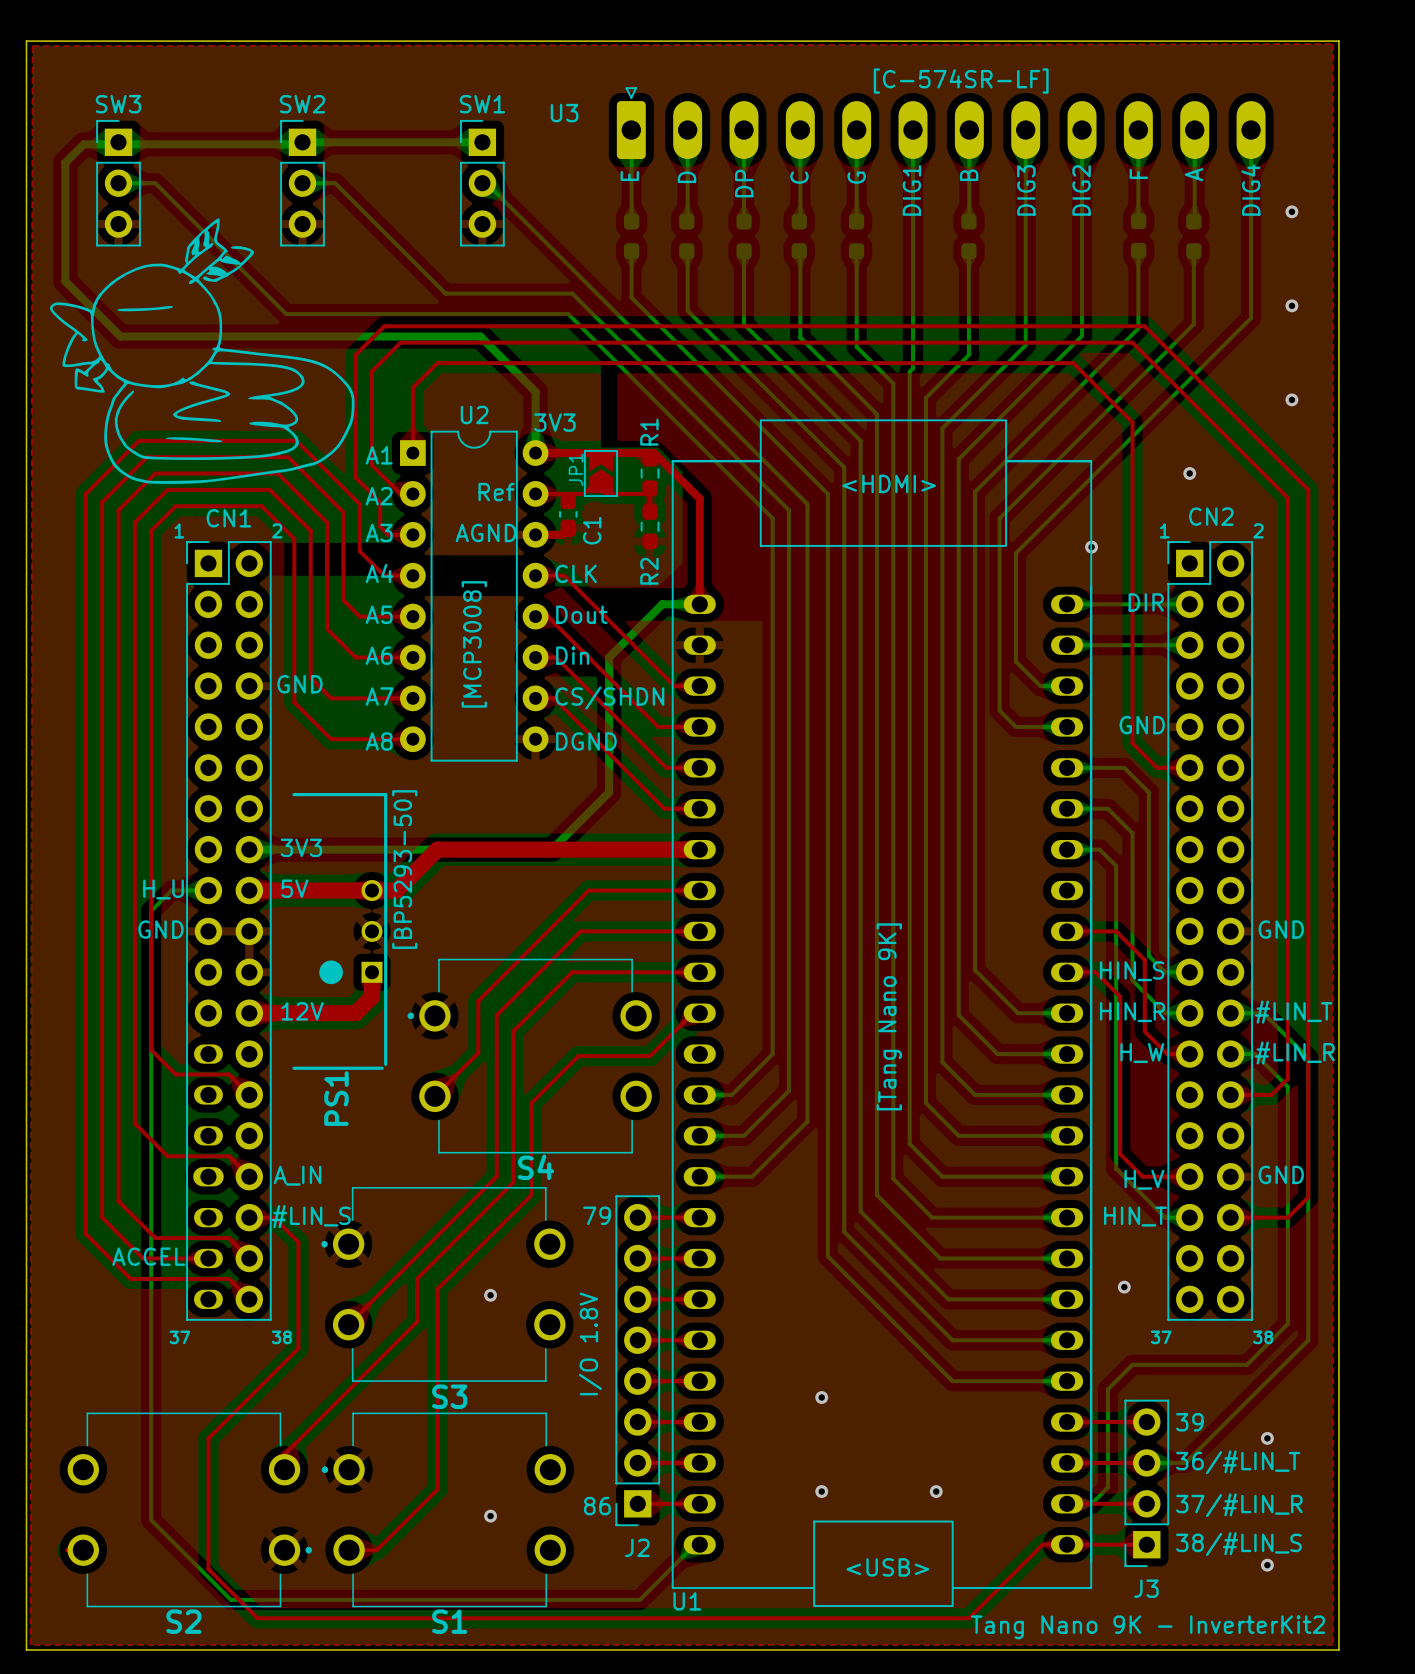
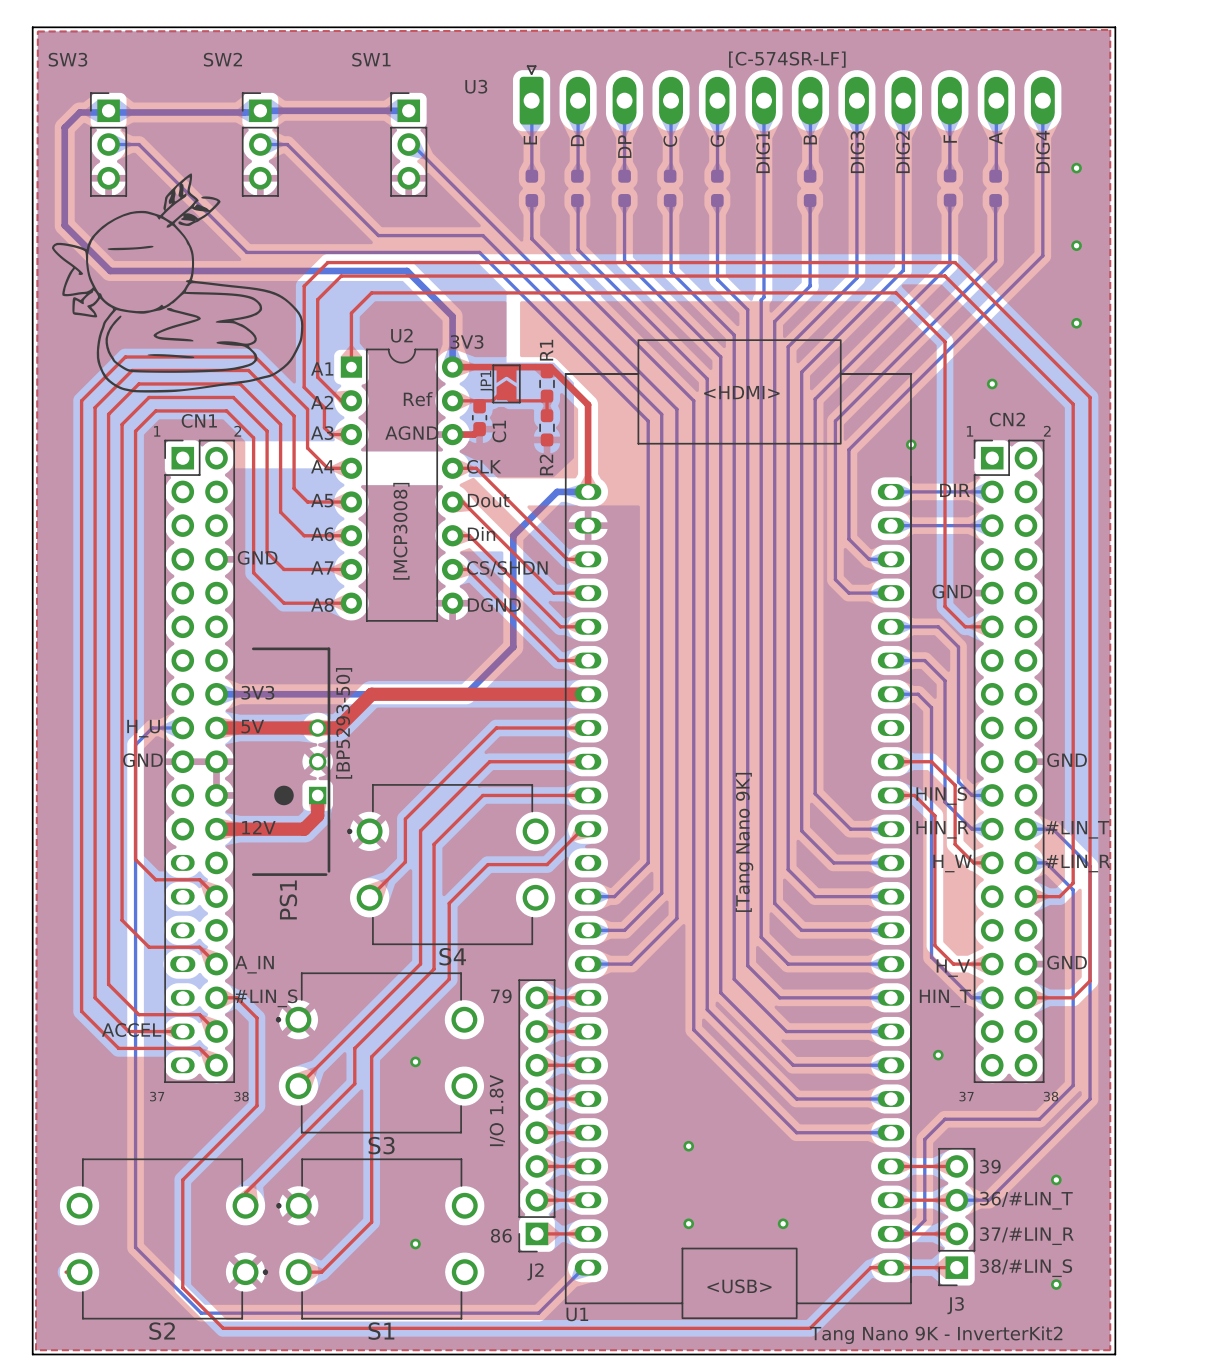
SW3 name position: SW3 (118, 104) -> SW3 (67, 59)
SW2 name position: SW2 (302, 104) -> SW2 (222, 59)
SW1 name position: SW1 (482, 104) -> SW1 (371, 59)

